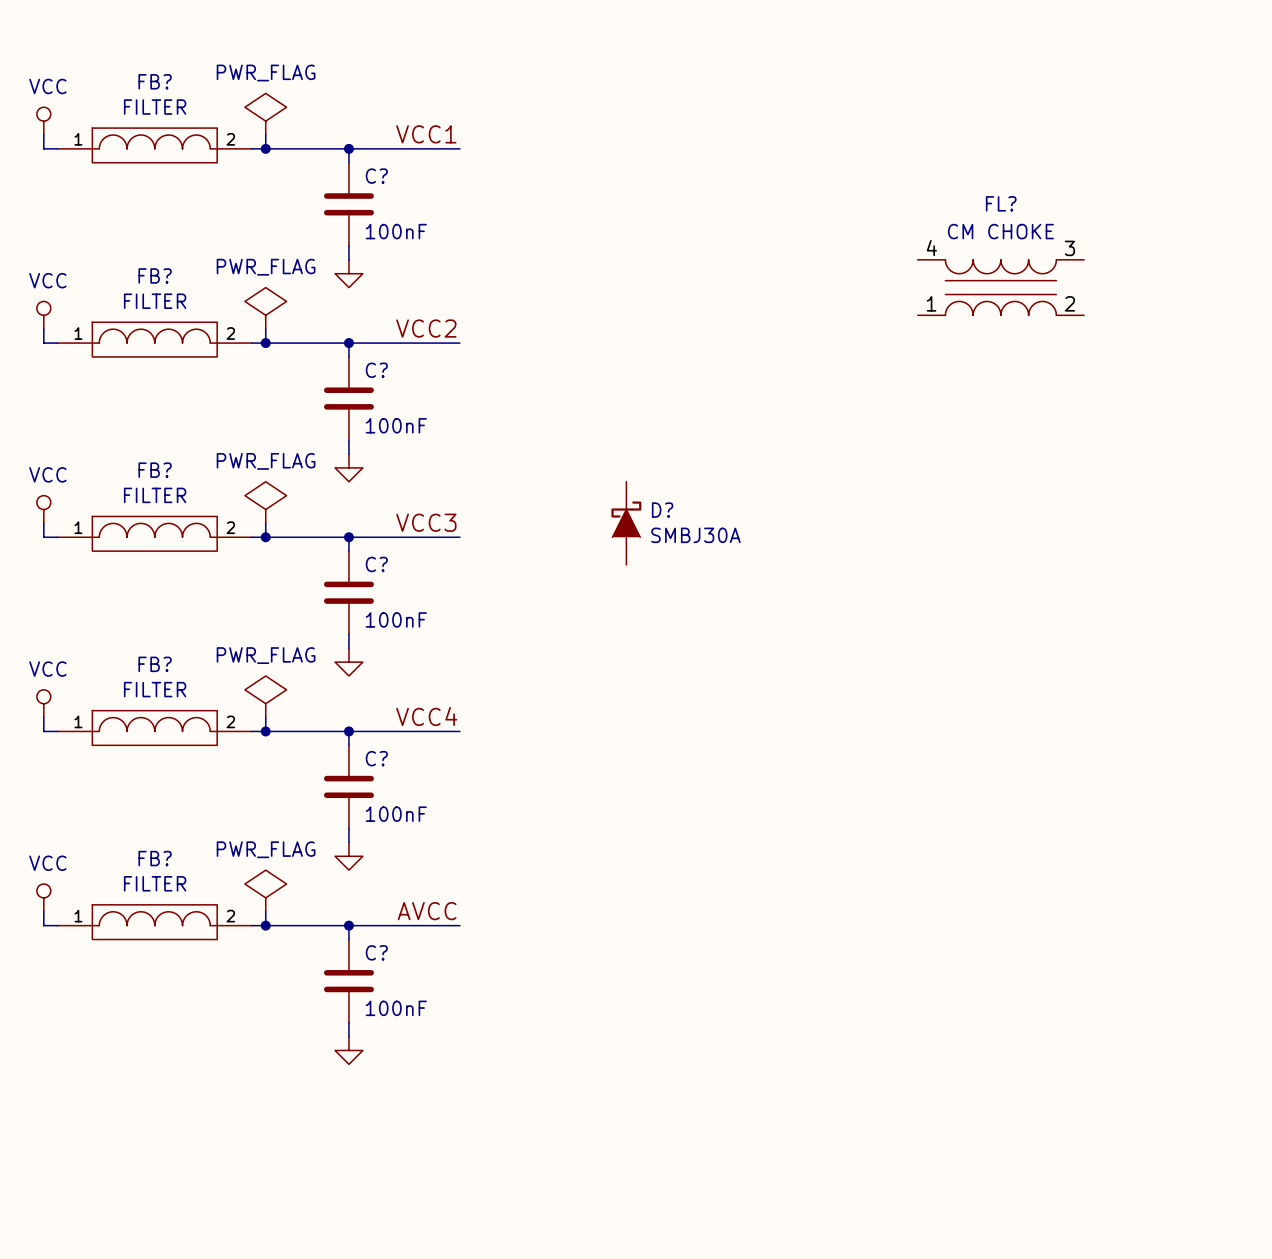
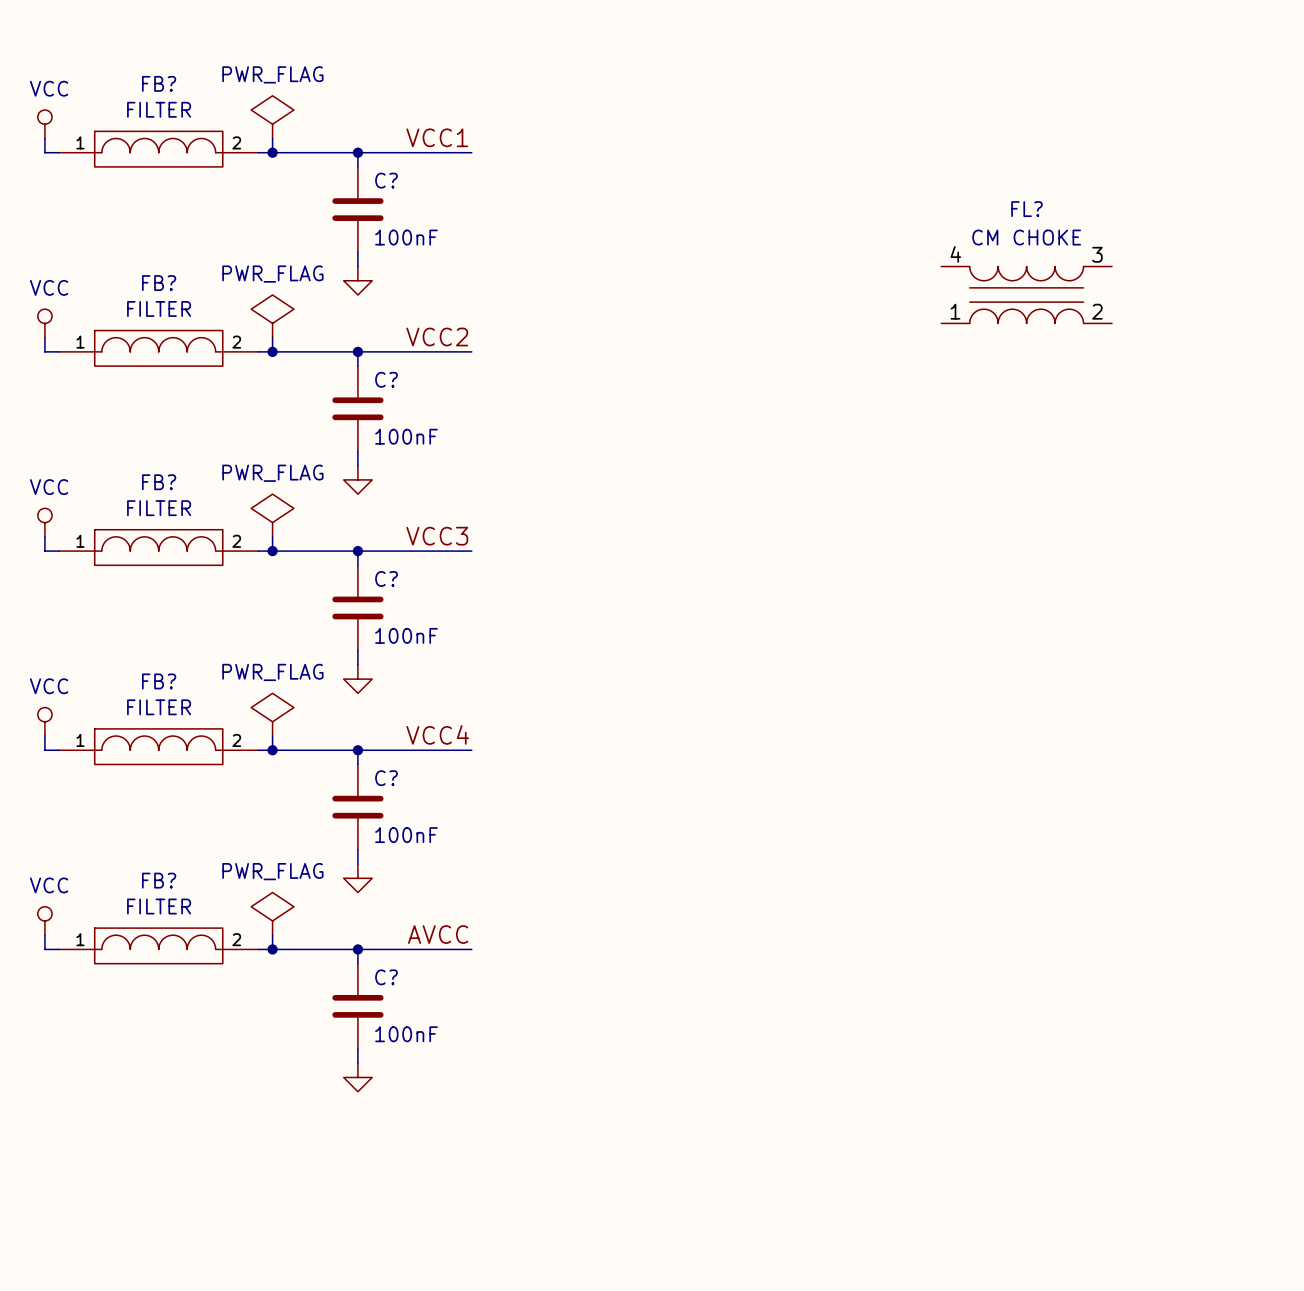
D?: SMBJ30A (626, 523) -> none

